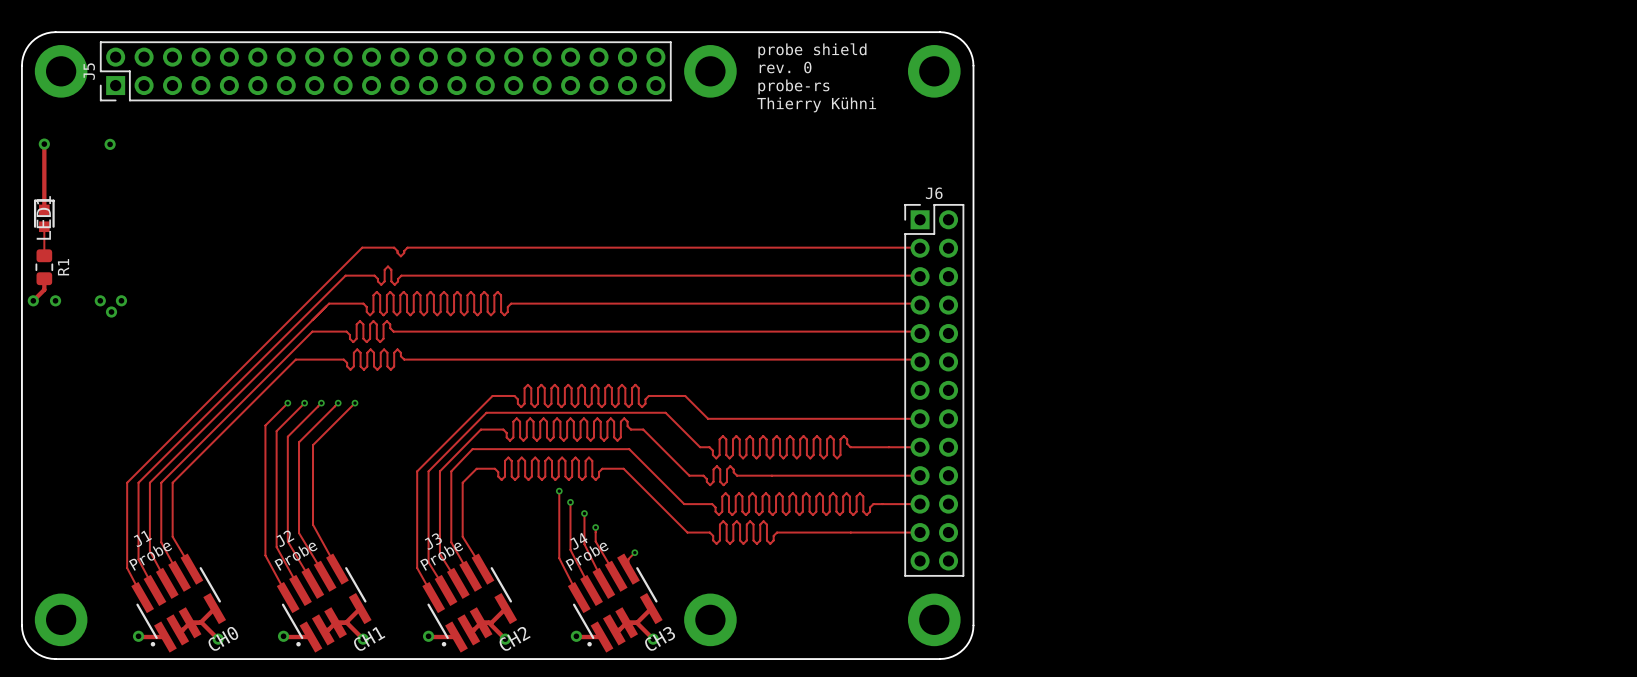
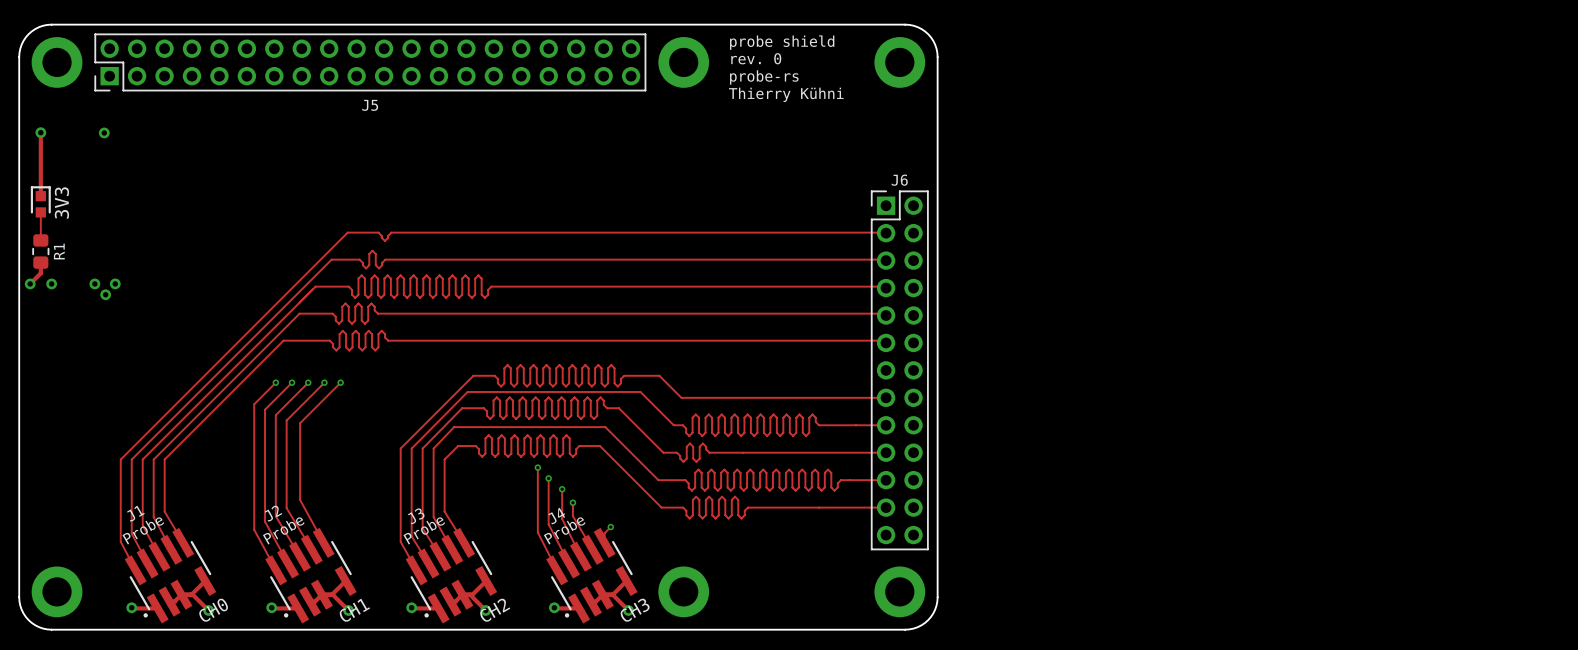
J5 name rotation: 0° (89, 71) -> 90° clockwise (370, 105)
J5 name position: J5 (89, 71) -> J5 (370, 105)
LED1 name: LED1 (43, 217) -> 3V3 (61, 202)

